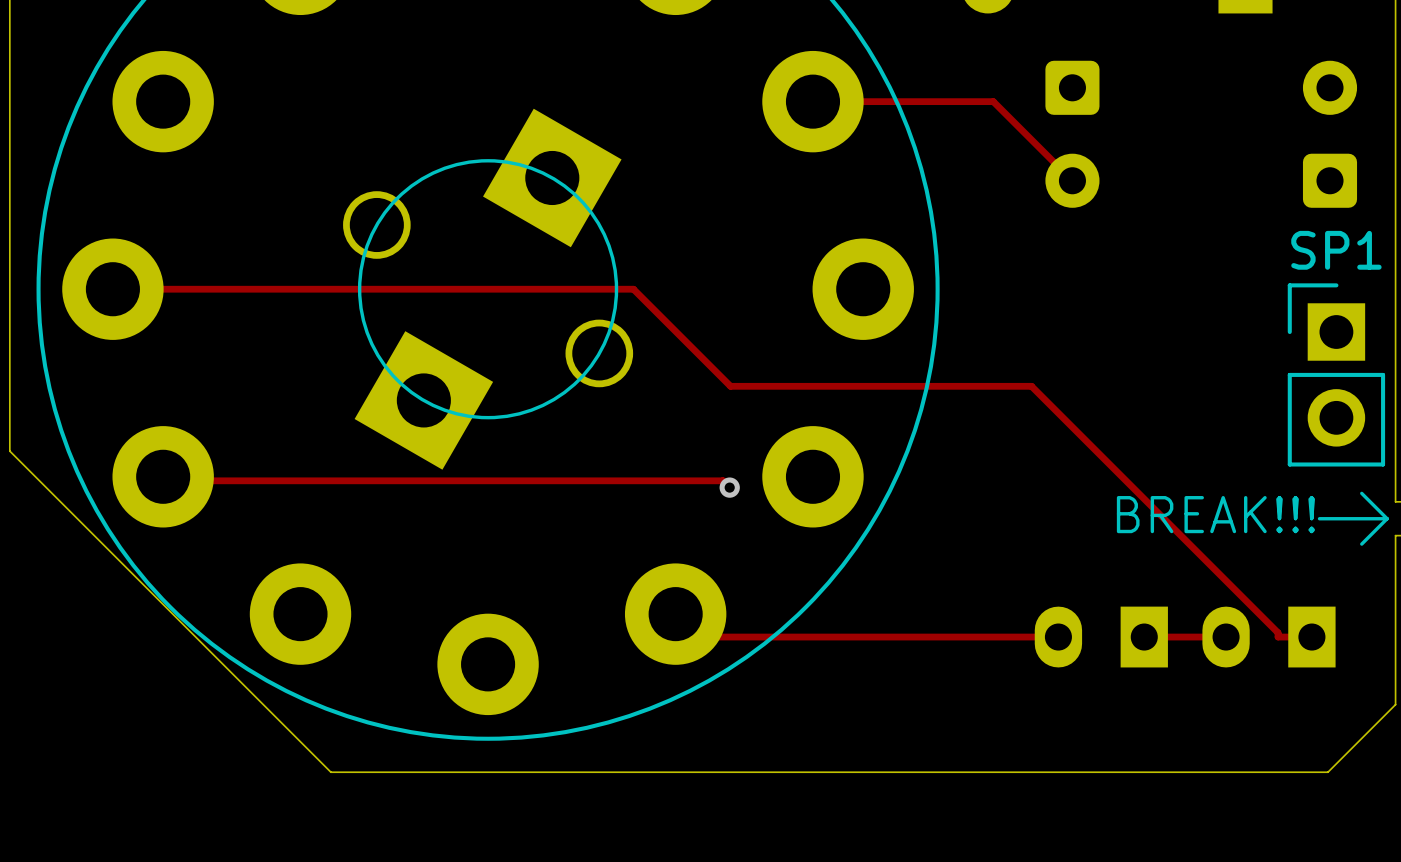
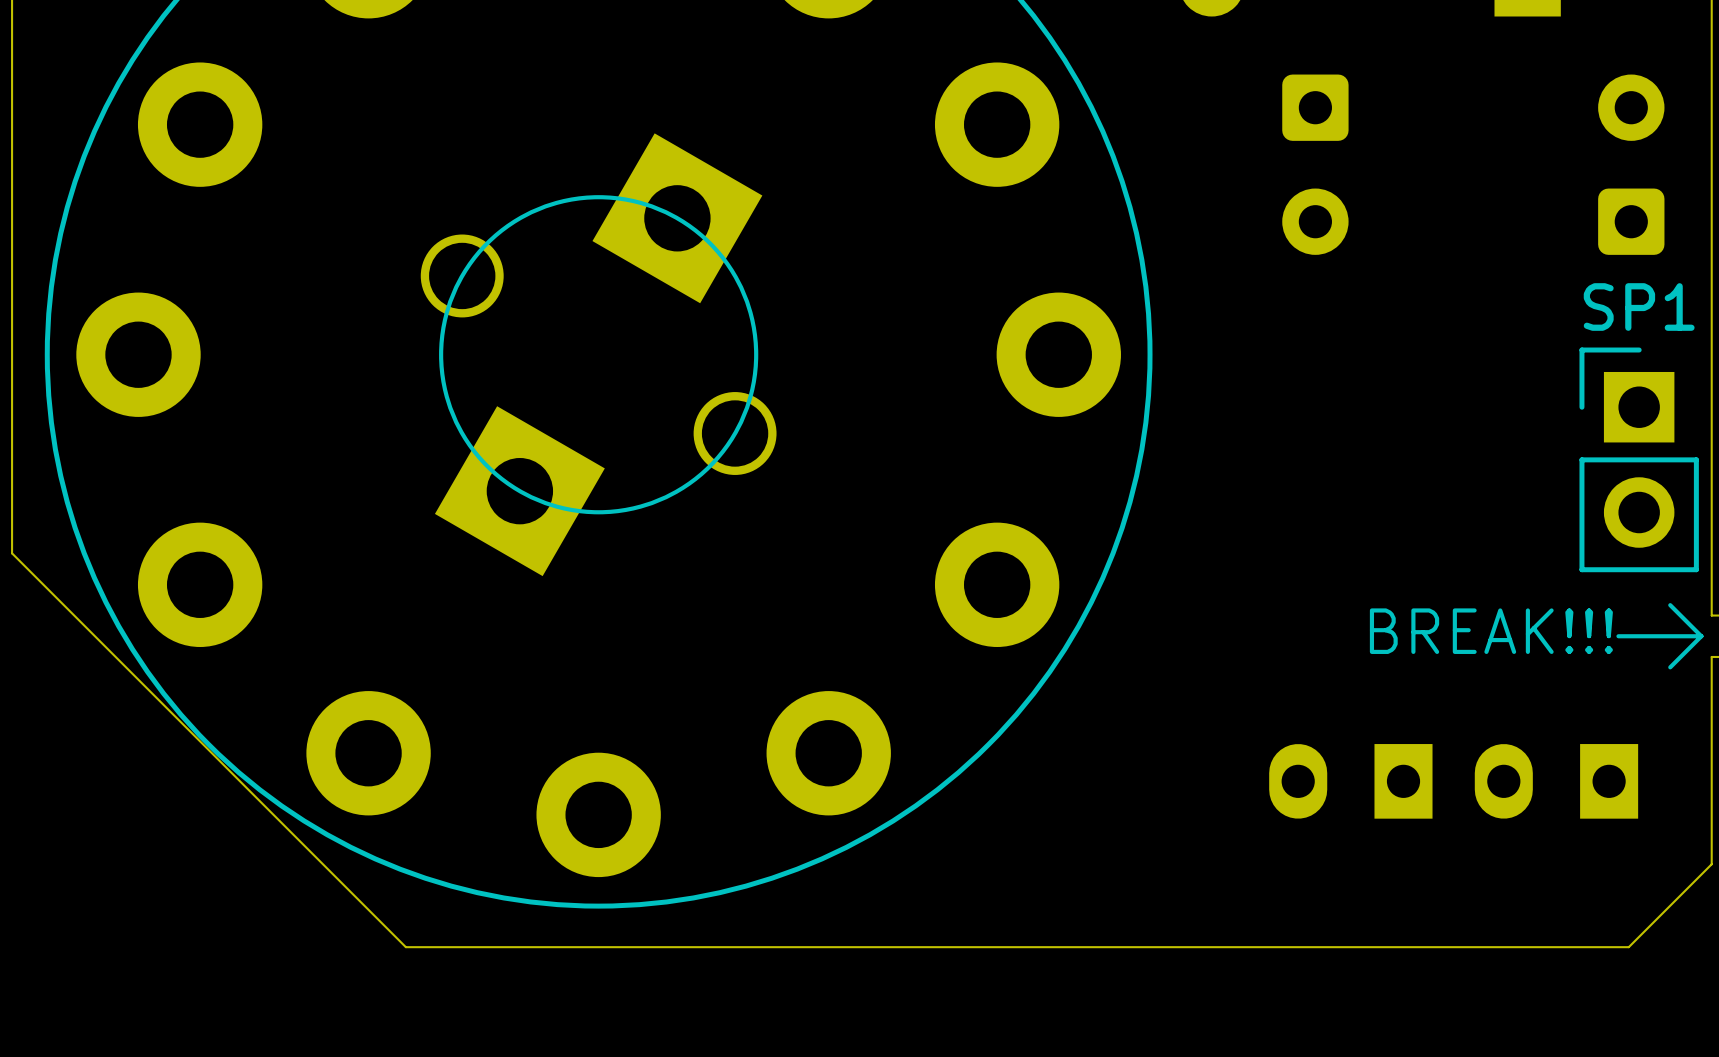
track: (812, 101) (993, 101) (1072, 180) -> none
track: (112, 289) (633, 289) (730, 386) (1031, 386) (1278, 632) (1278, 637) (1311, 637) -> none
track: (163, 476) (167, 480) (722, 480) (729, 487) -> none
via: (729, 487) -> none
track: (675, 614) (698, 637) (1058, 637) -> none
track: (1144, 637) (1226, 637) -> none

